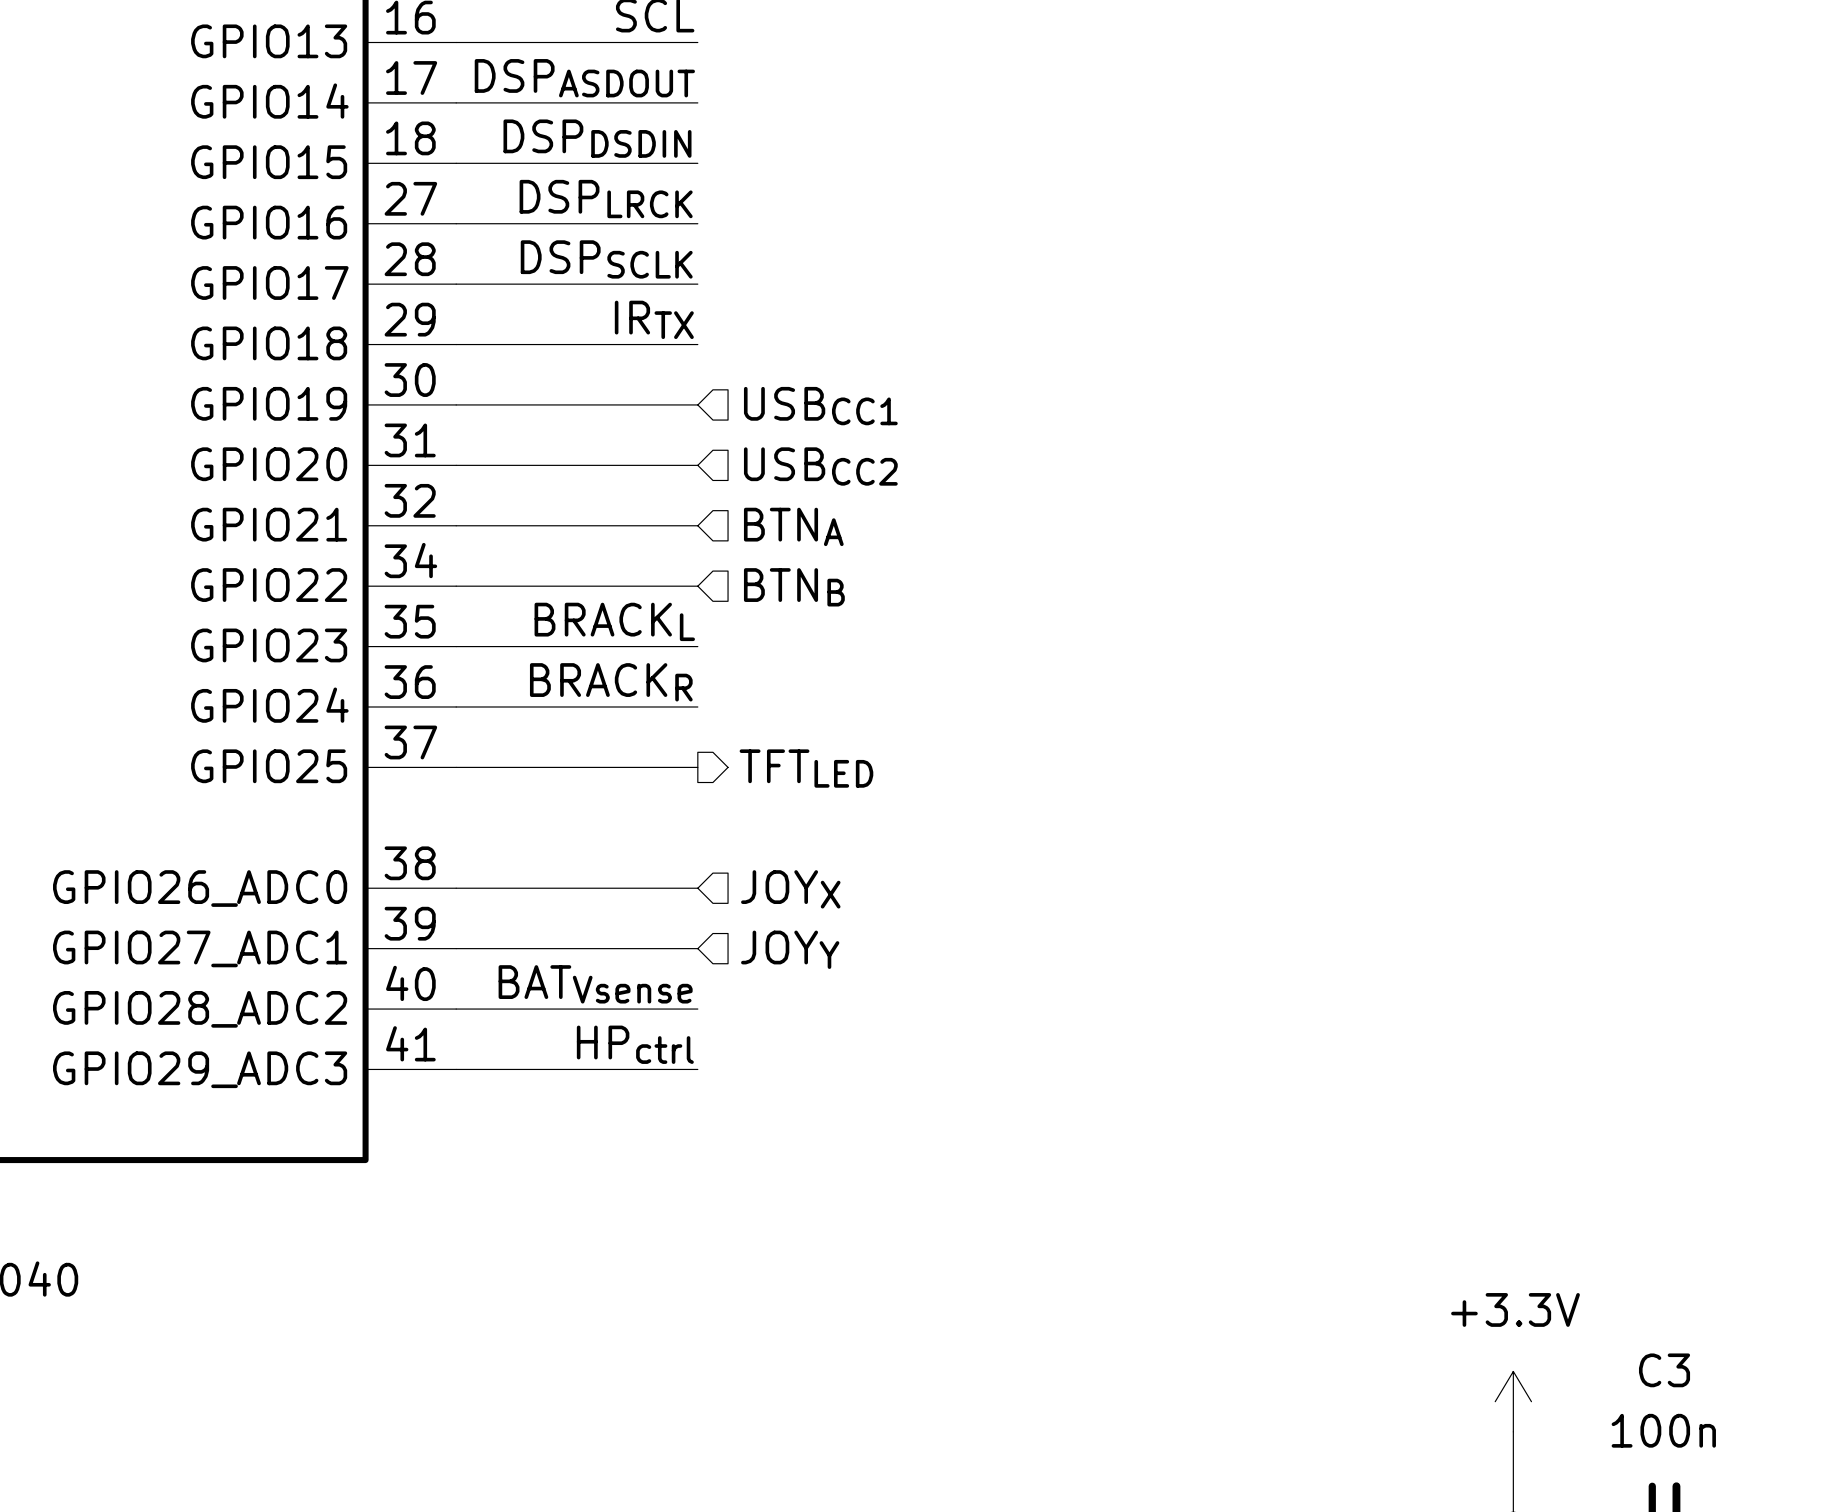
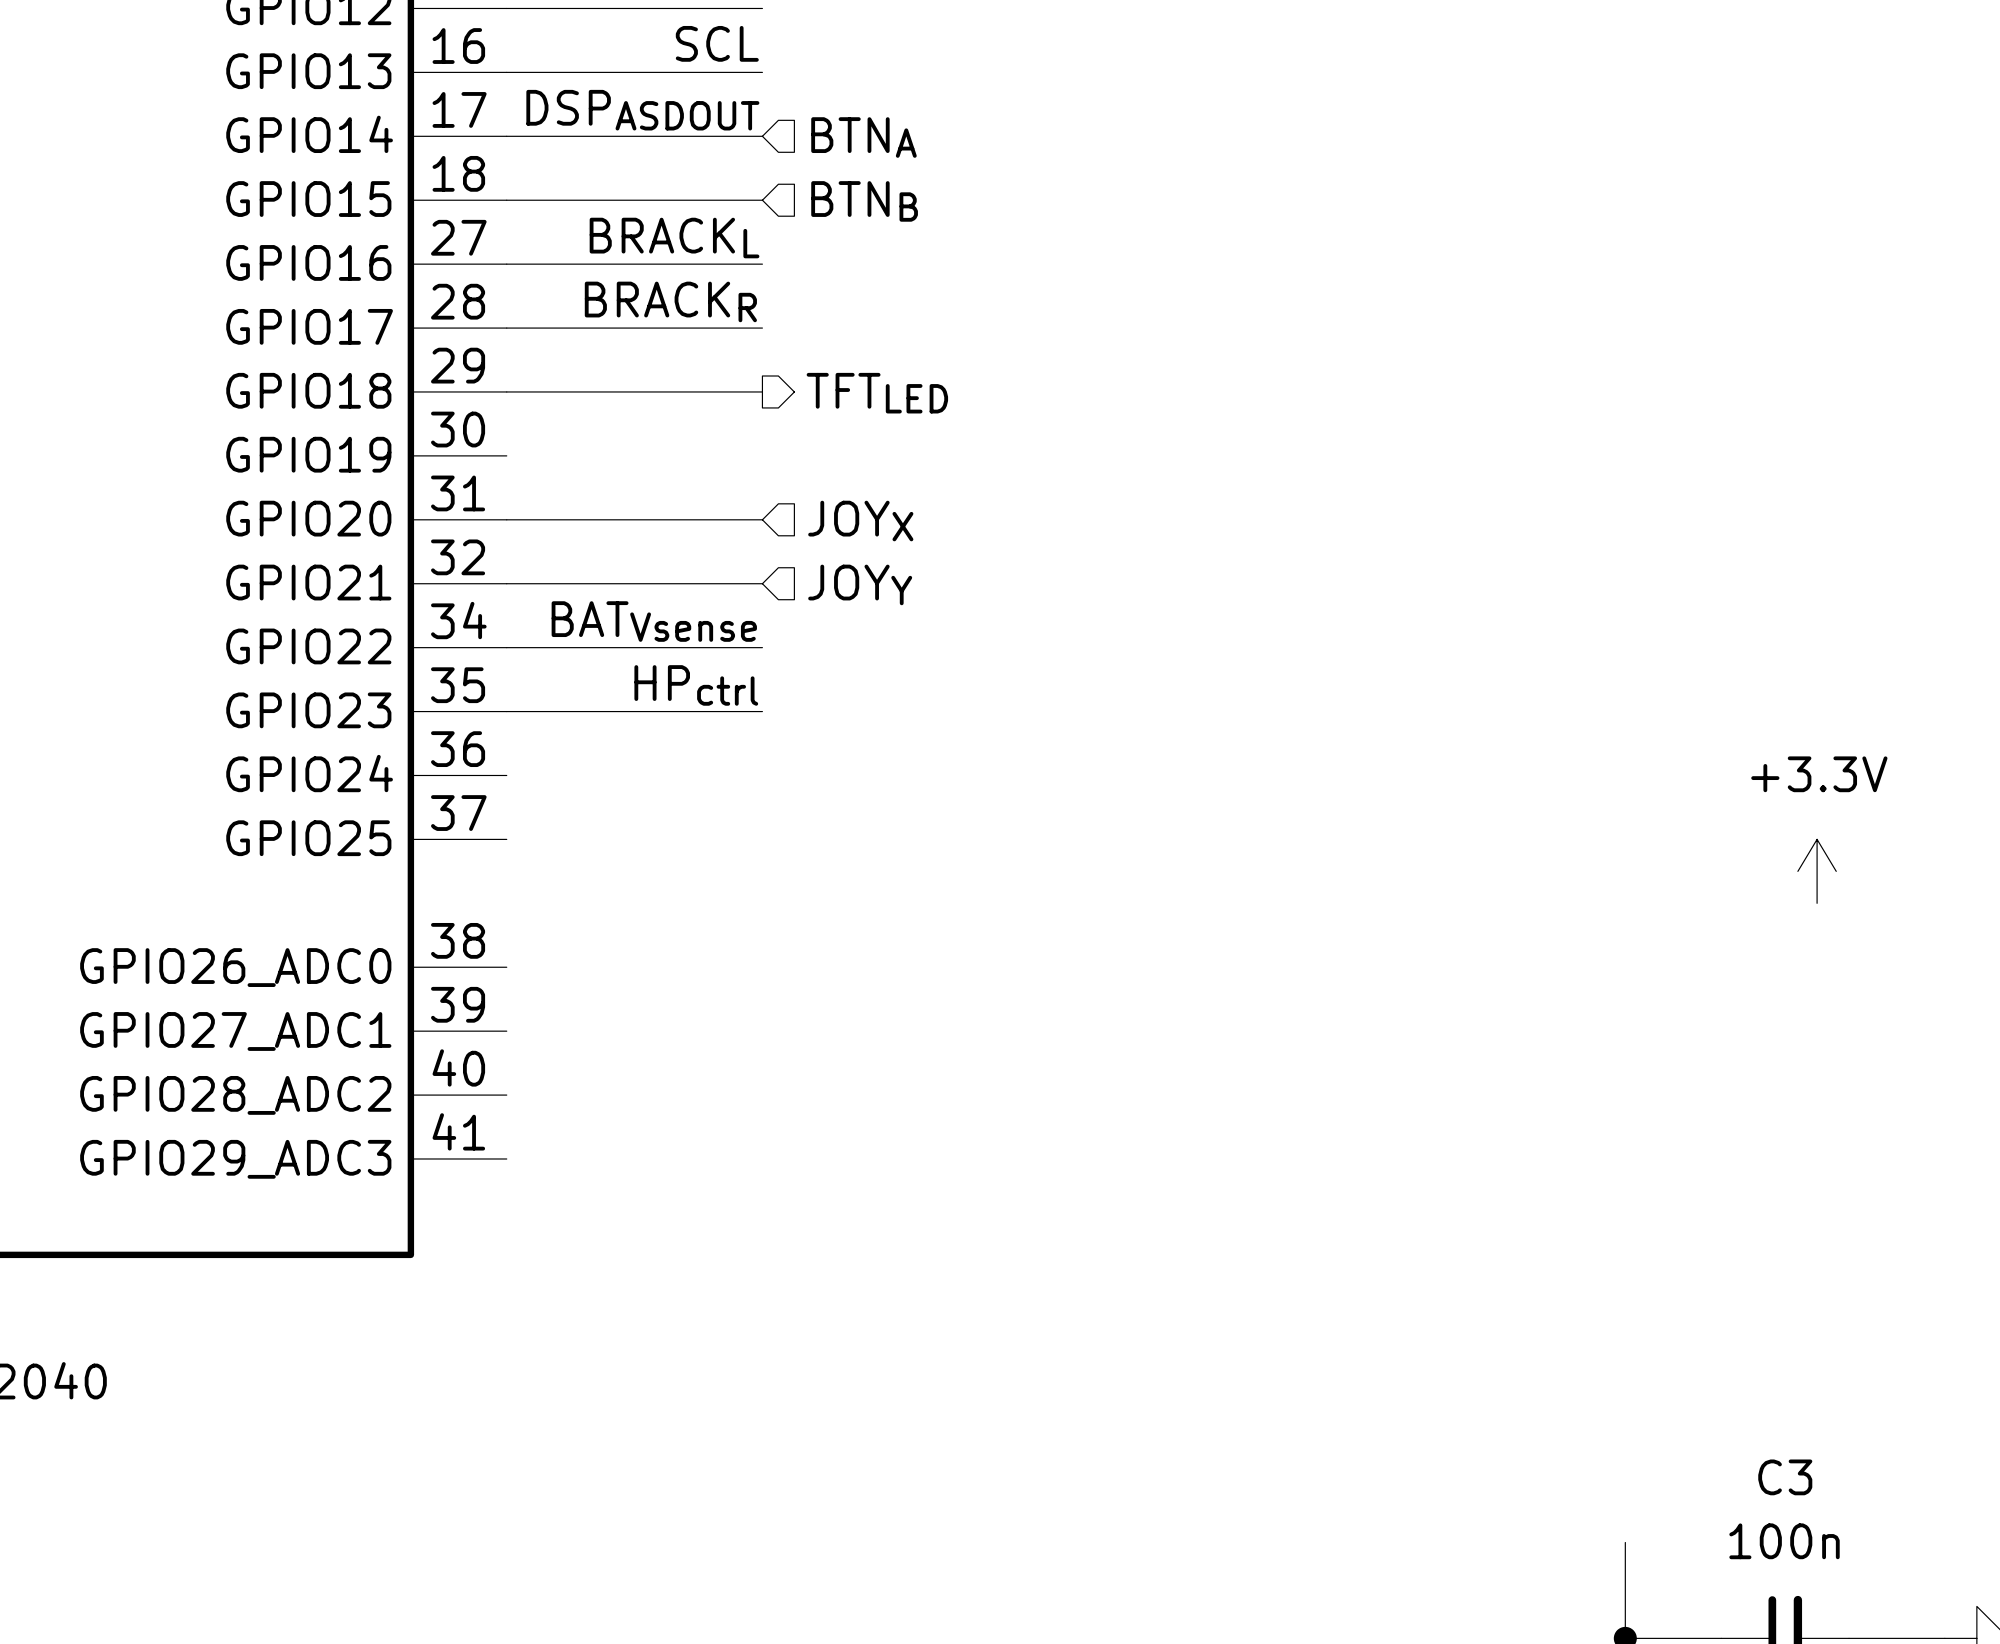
hierarchical label: none -> BTNA (863, 137)
label: DSPDSDIN (597, 138) -> none
label: DSPLRCK (606, 199) -> BRACKL (674, 238)
label: DSPSCLK (606, 259) -> BRACKR (670, 301)
label: IRTX (654, 319) -> none
wire: (456, 404) (697, 404) -> none
hierarchical label: USBCC1 (820, 406) -> none
hierarchical label: USBCC2 (820, 466) -> JOYX (860, 521)
hierarchical label: BTNA (793, 526) -> JOYY (860, 584)
hierarchical label position: BTNB (794, 587) -> BTNB (864, 201)
label: BRACKL (614, 621) -> HPctrl (696, 685)
label: BRACKR (611, 682) -> none
wire: (456, 706) (697, 706) -> none
wire: (456, 767) (697, 767) -> none
hierarchical label position: TFTLED (806, 768) -> TFTLED (877, 393)
power symbol: none -> +3.3V (1817, 871)
wire: (456, 888) (697, 888) -> none
hierarchical label: JOYX (790, 889) -> none
wire: (456, 948) (697, 948) -> none
hierarchical label: JOYY (790, 949) -> none
label position: BATVsense (595, 984) -> BATVsense (654, 621)
wire: (456, 1009) (697, 1009) -> none
label: HPctrl (635, 1044) -> none
wire: (456, 1069) (697, 1069) -> none
power symbol: +3.3V (1513, 1401) -> none

